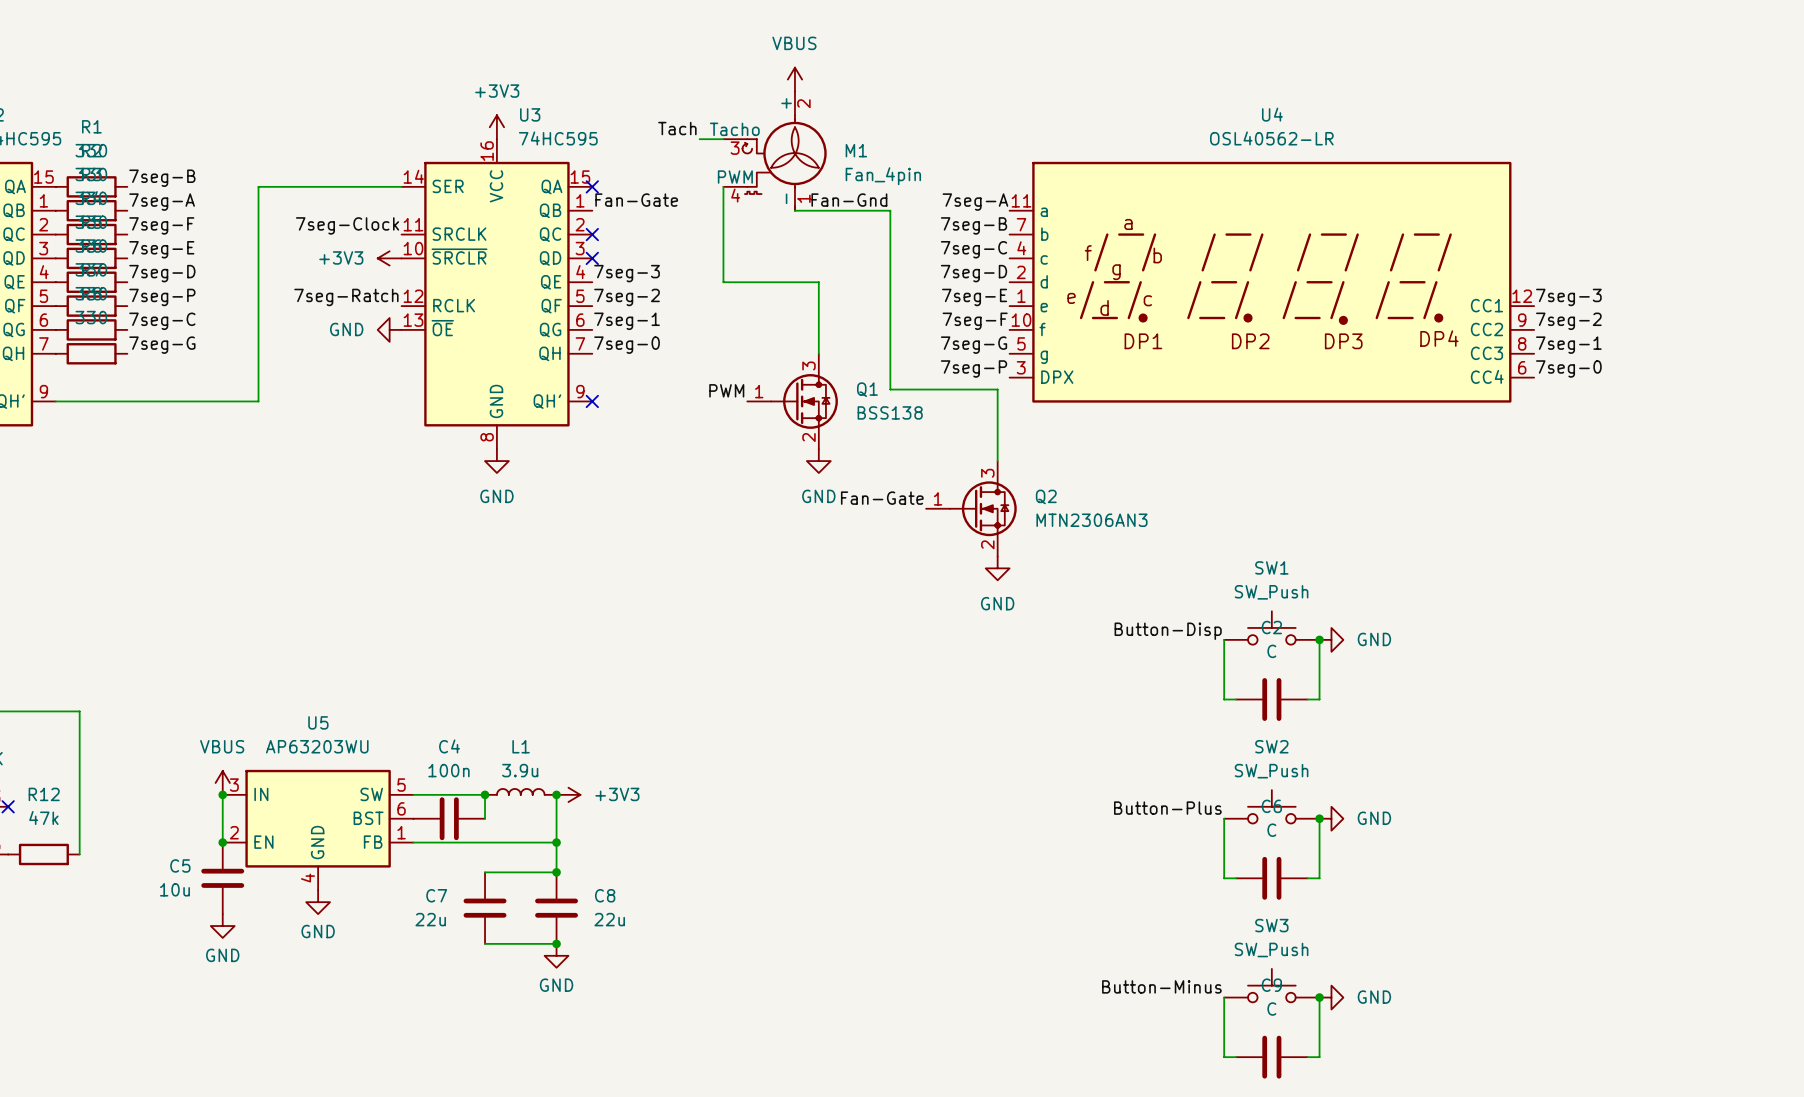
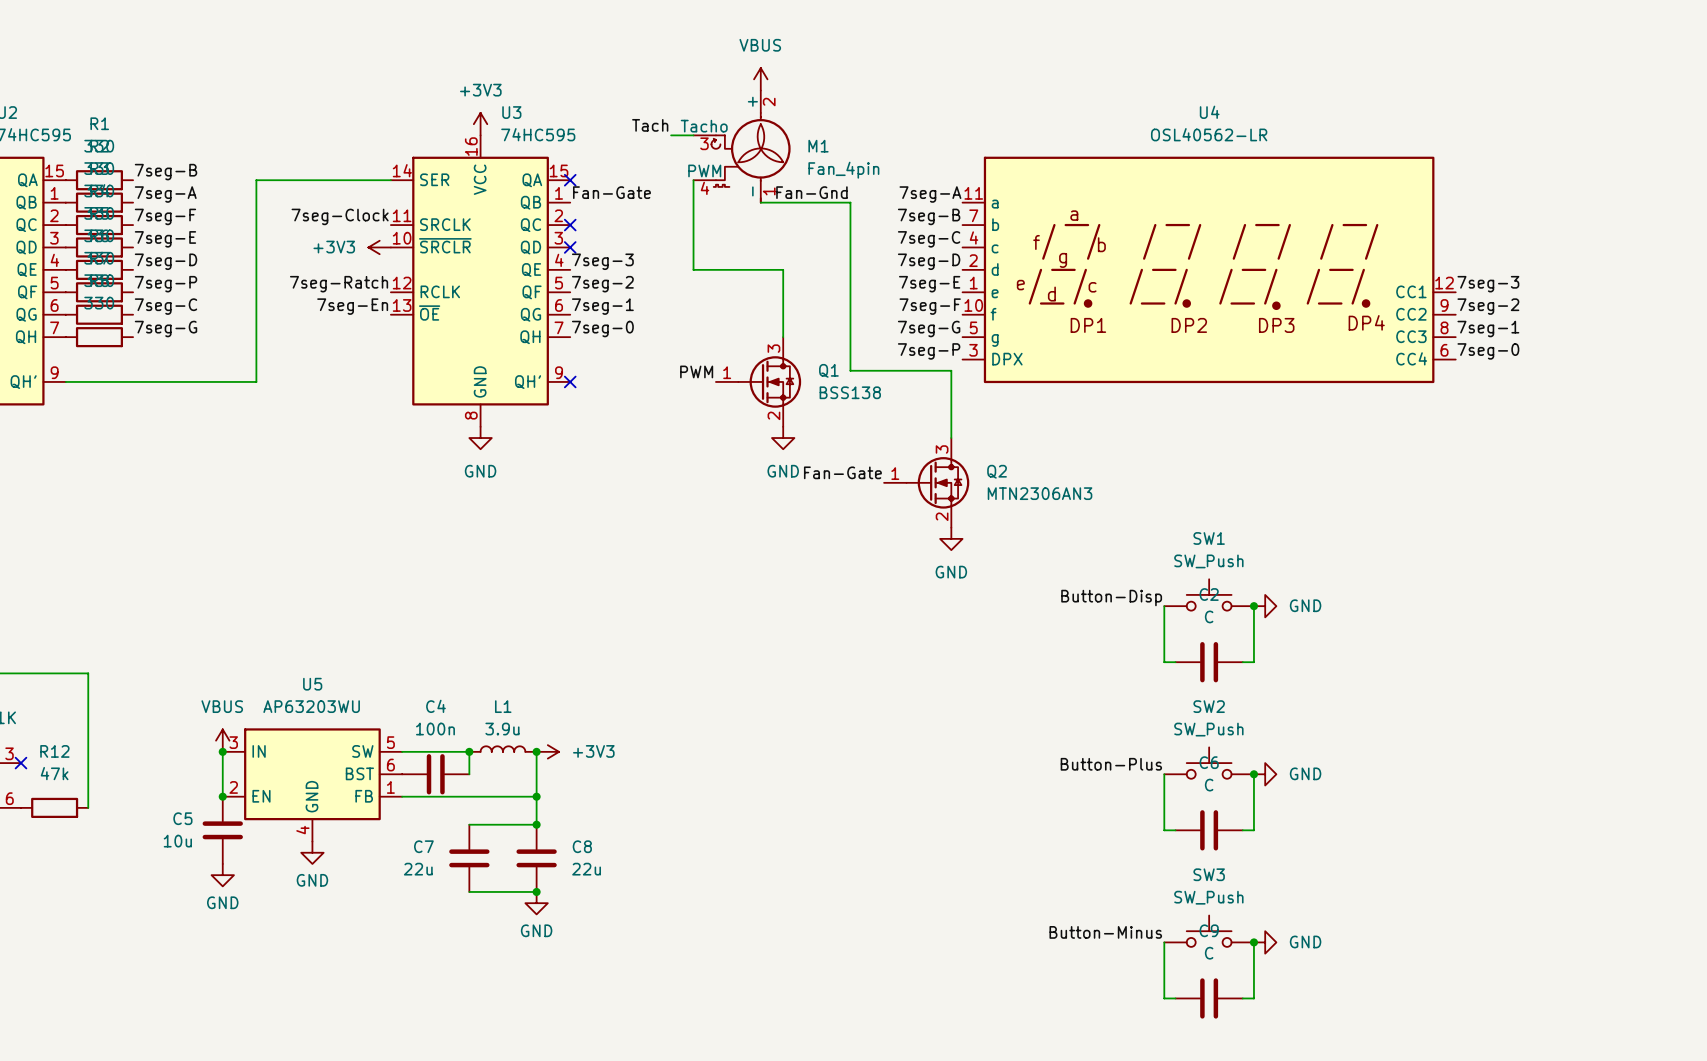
label: none -> 7seg-En (352, 306)
power symbol: GND (389, 329) -> none

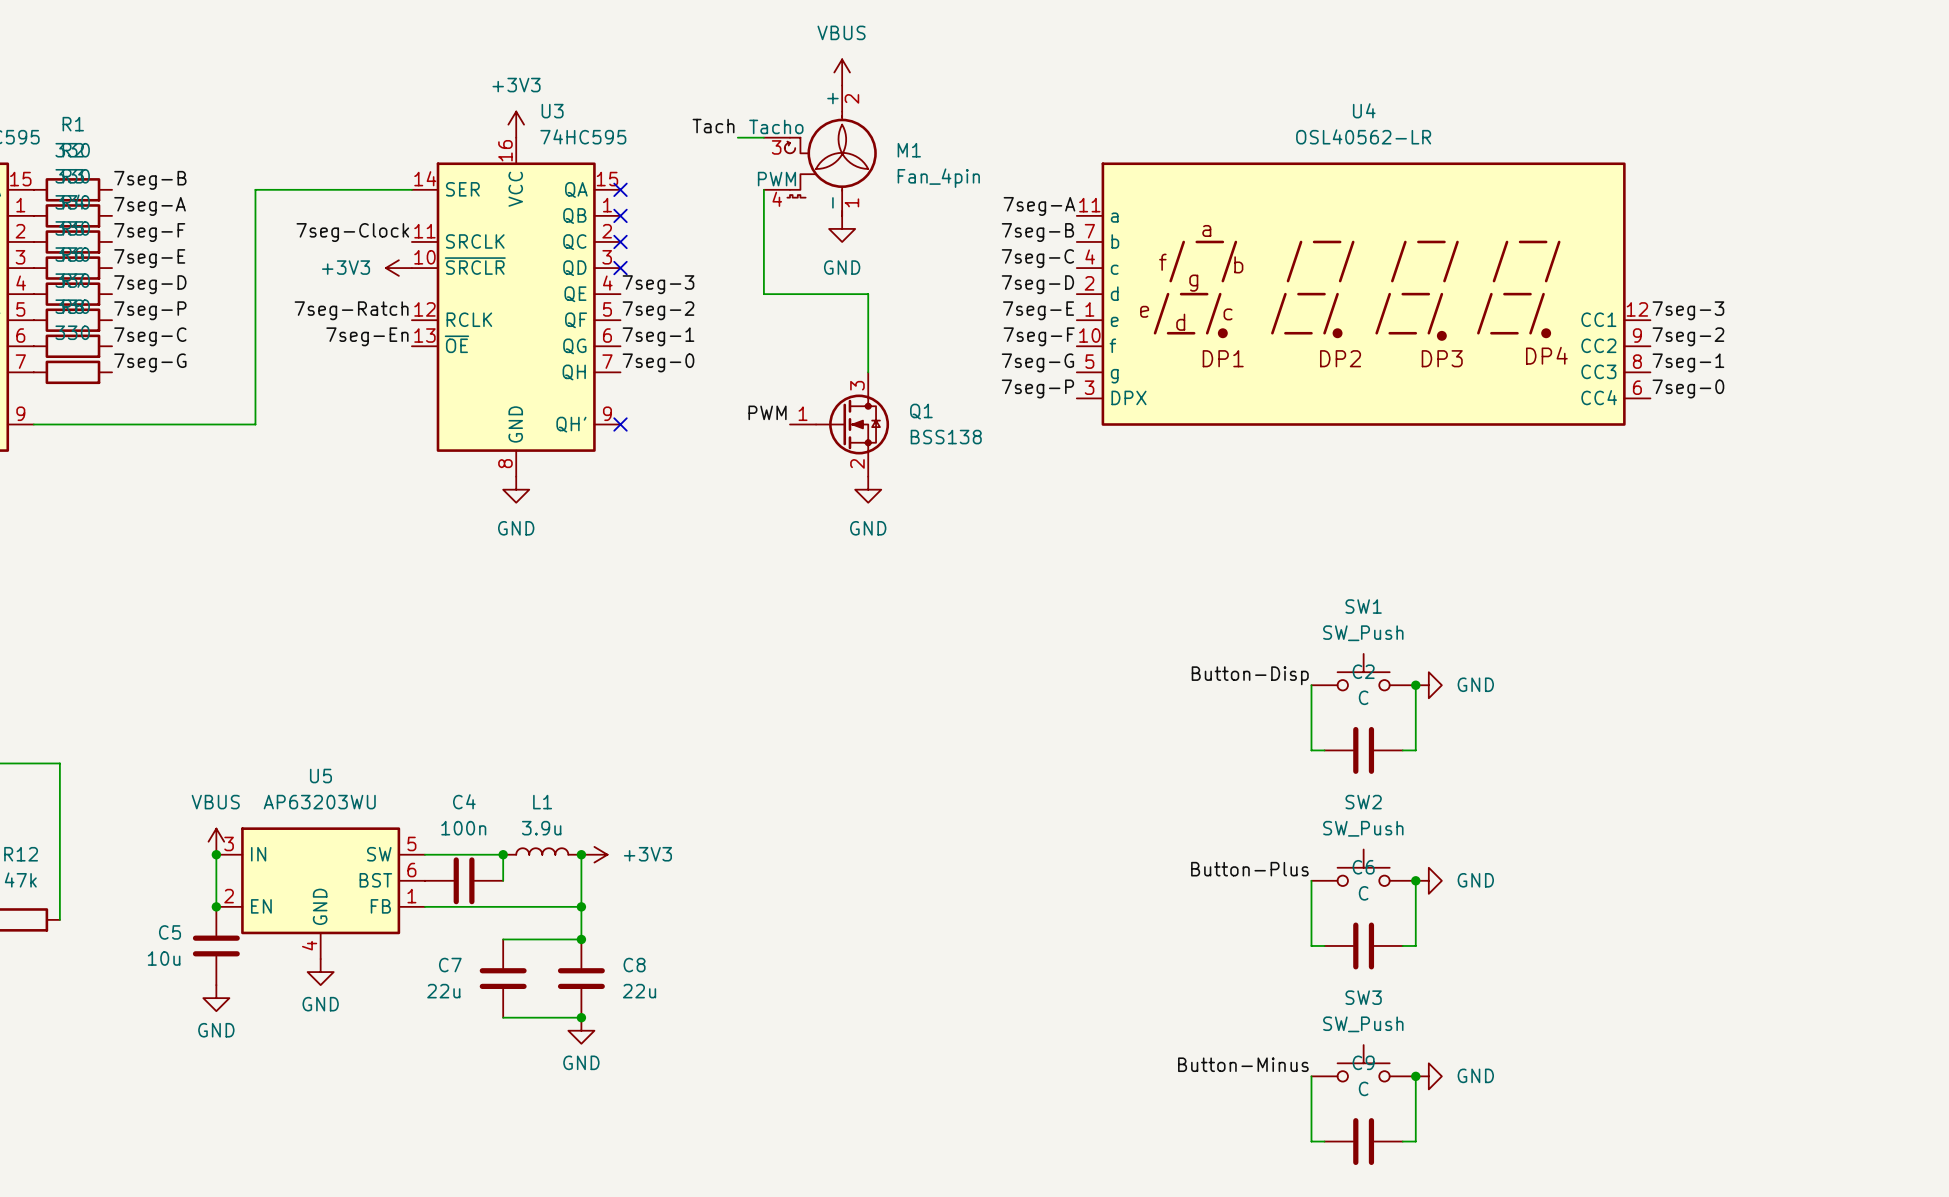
label: Fan-Gate (611, 192) -> none
label: Fan-Gnd (811, 192) -> none
no-connect mark: none -> (620, 215)
wire: (760, 202) (850, 202) (850, 370) (951, 370) (951, 438) -> none
power symbol: none -> GND (842, 228)
label: Fan-Gate (842, 472) -> none
Q2: MTN2306AN3 (926, 482) -> none
power symbol: GND (951, 538) -> none

